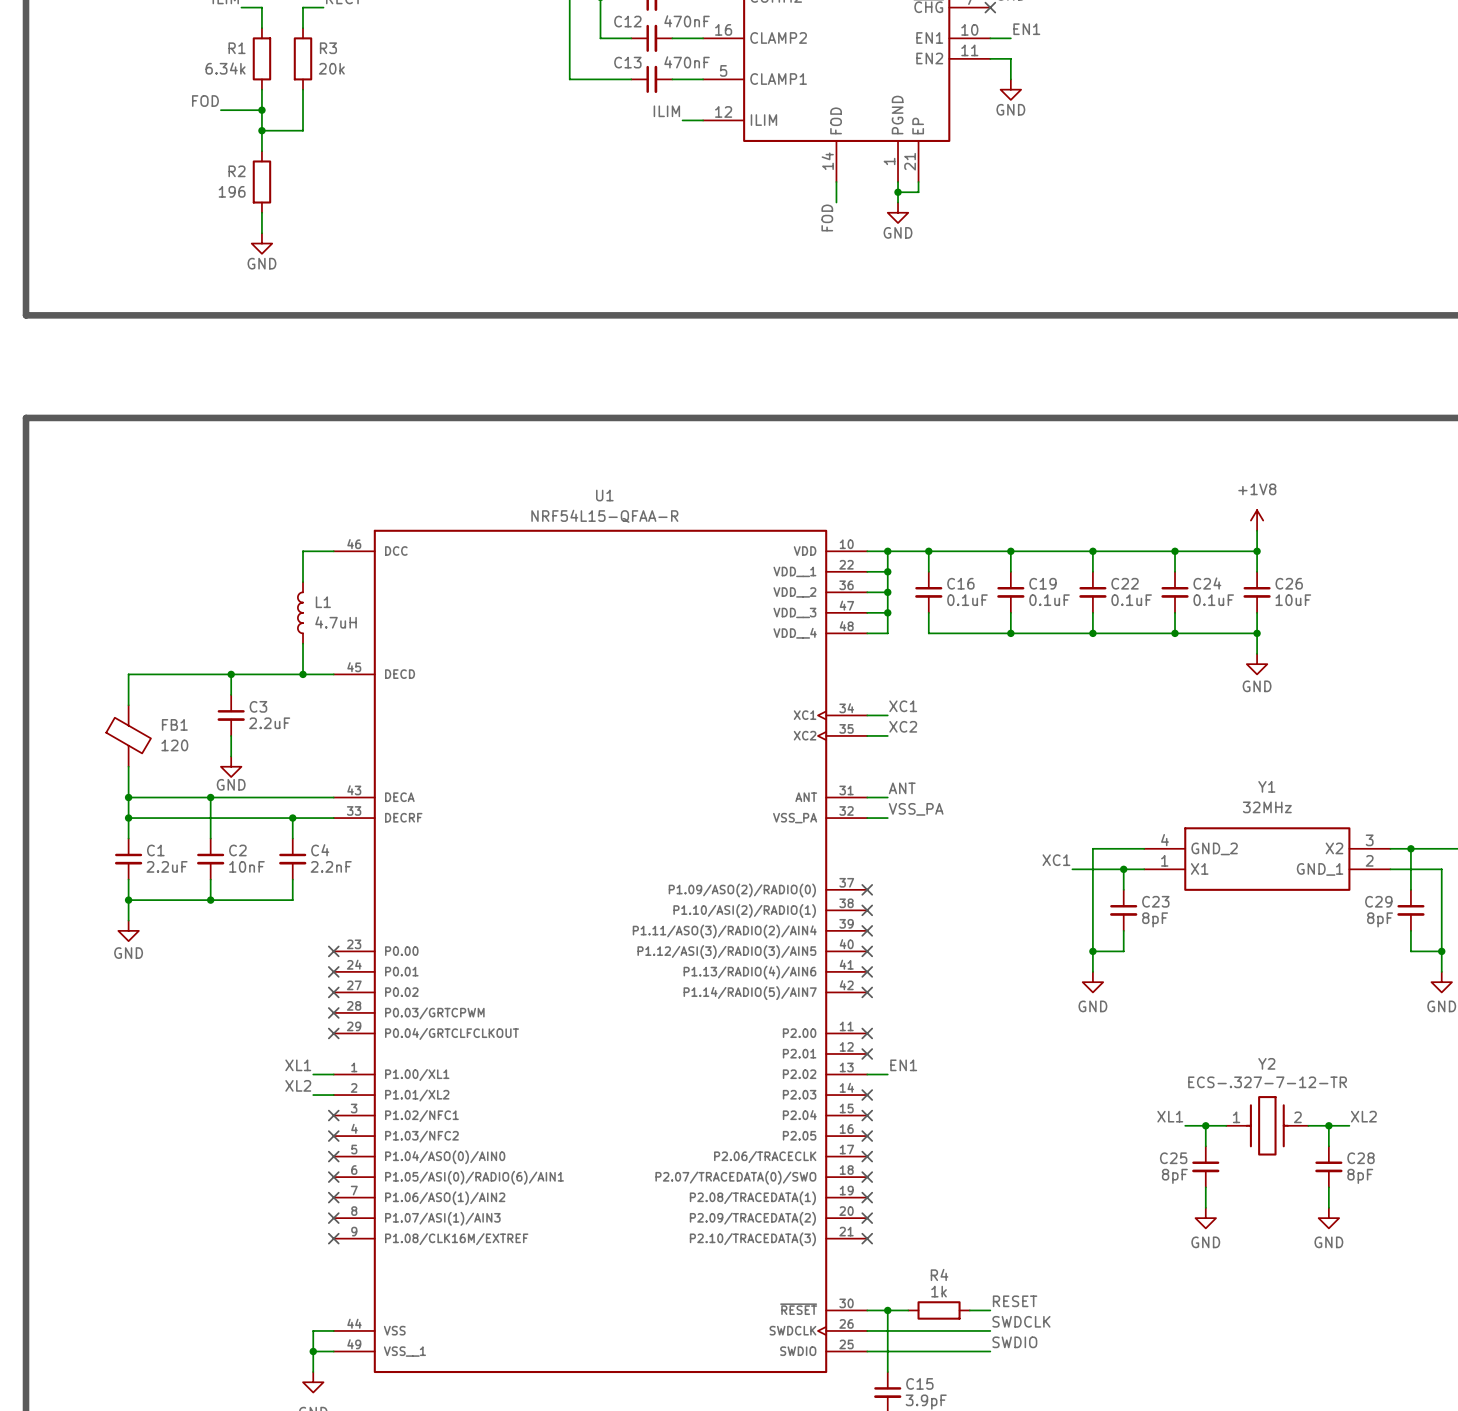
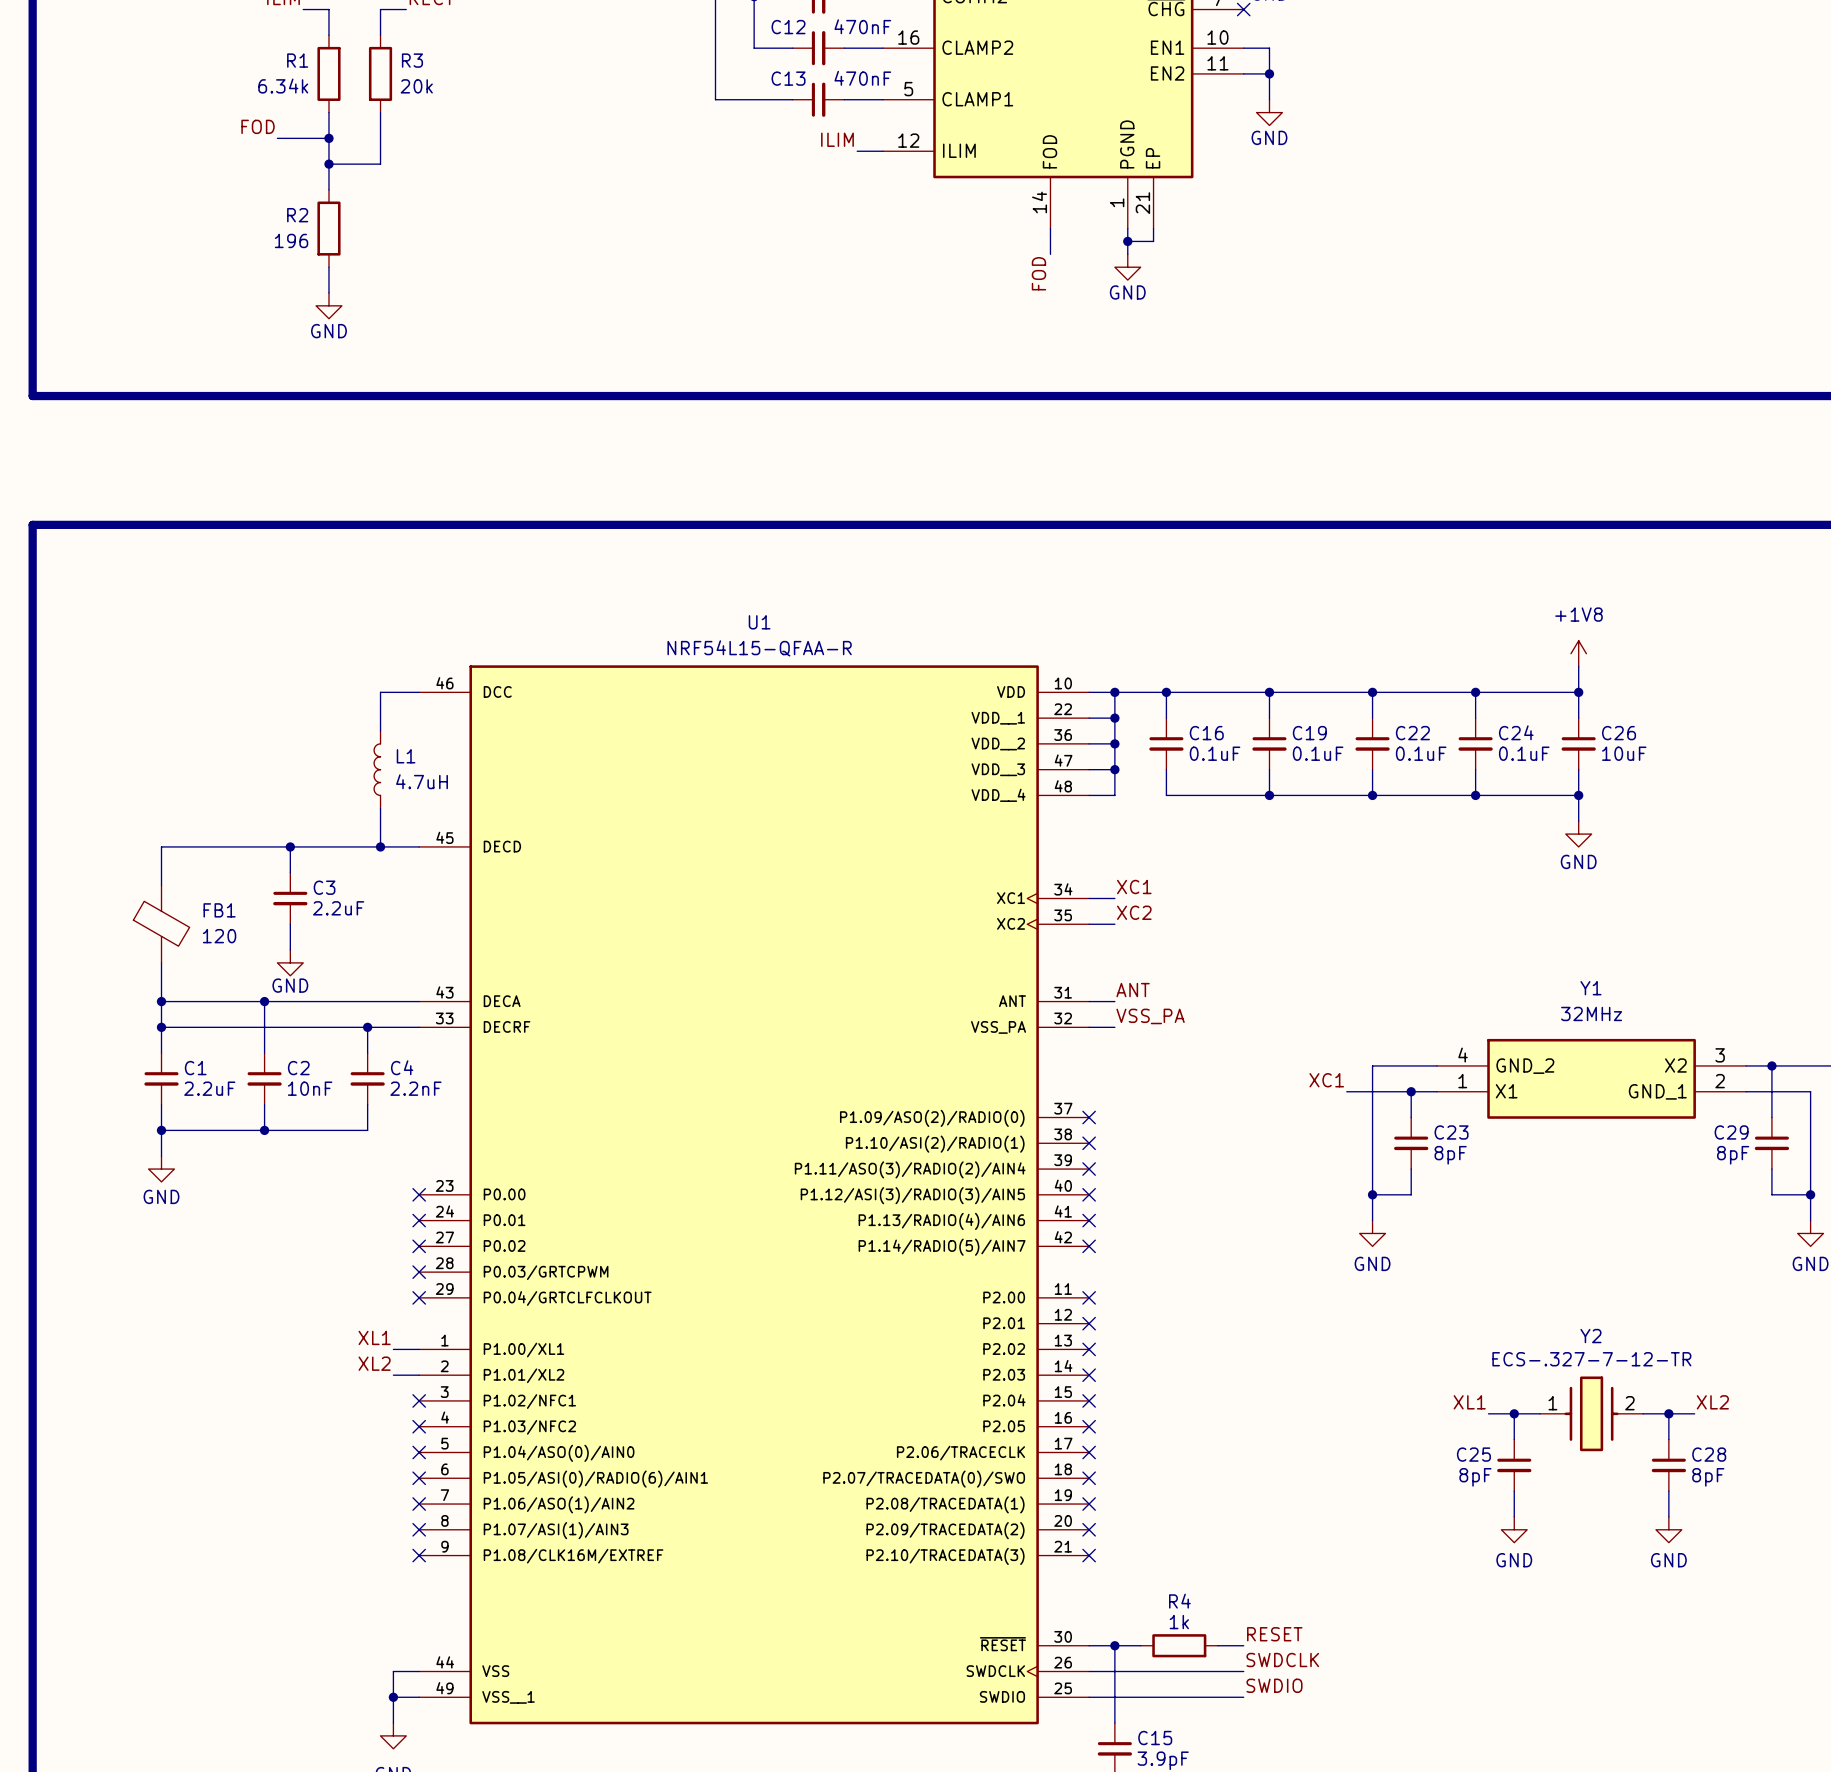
label: EN1 (1026, 29) -> none
wire: none -> (1269, 48) (1269, 73)
junction: none -> (1269, 73)
label: EN1 (903, 1065) -> none
wire: (867, 1074) (887, 1074) -> none
no-connect mark: none -> (1089, 1349)

